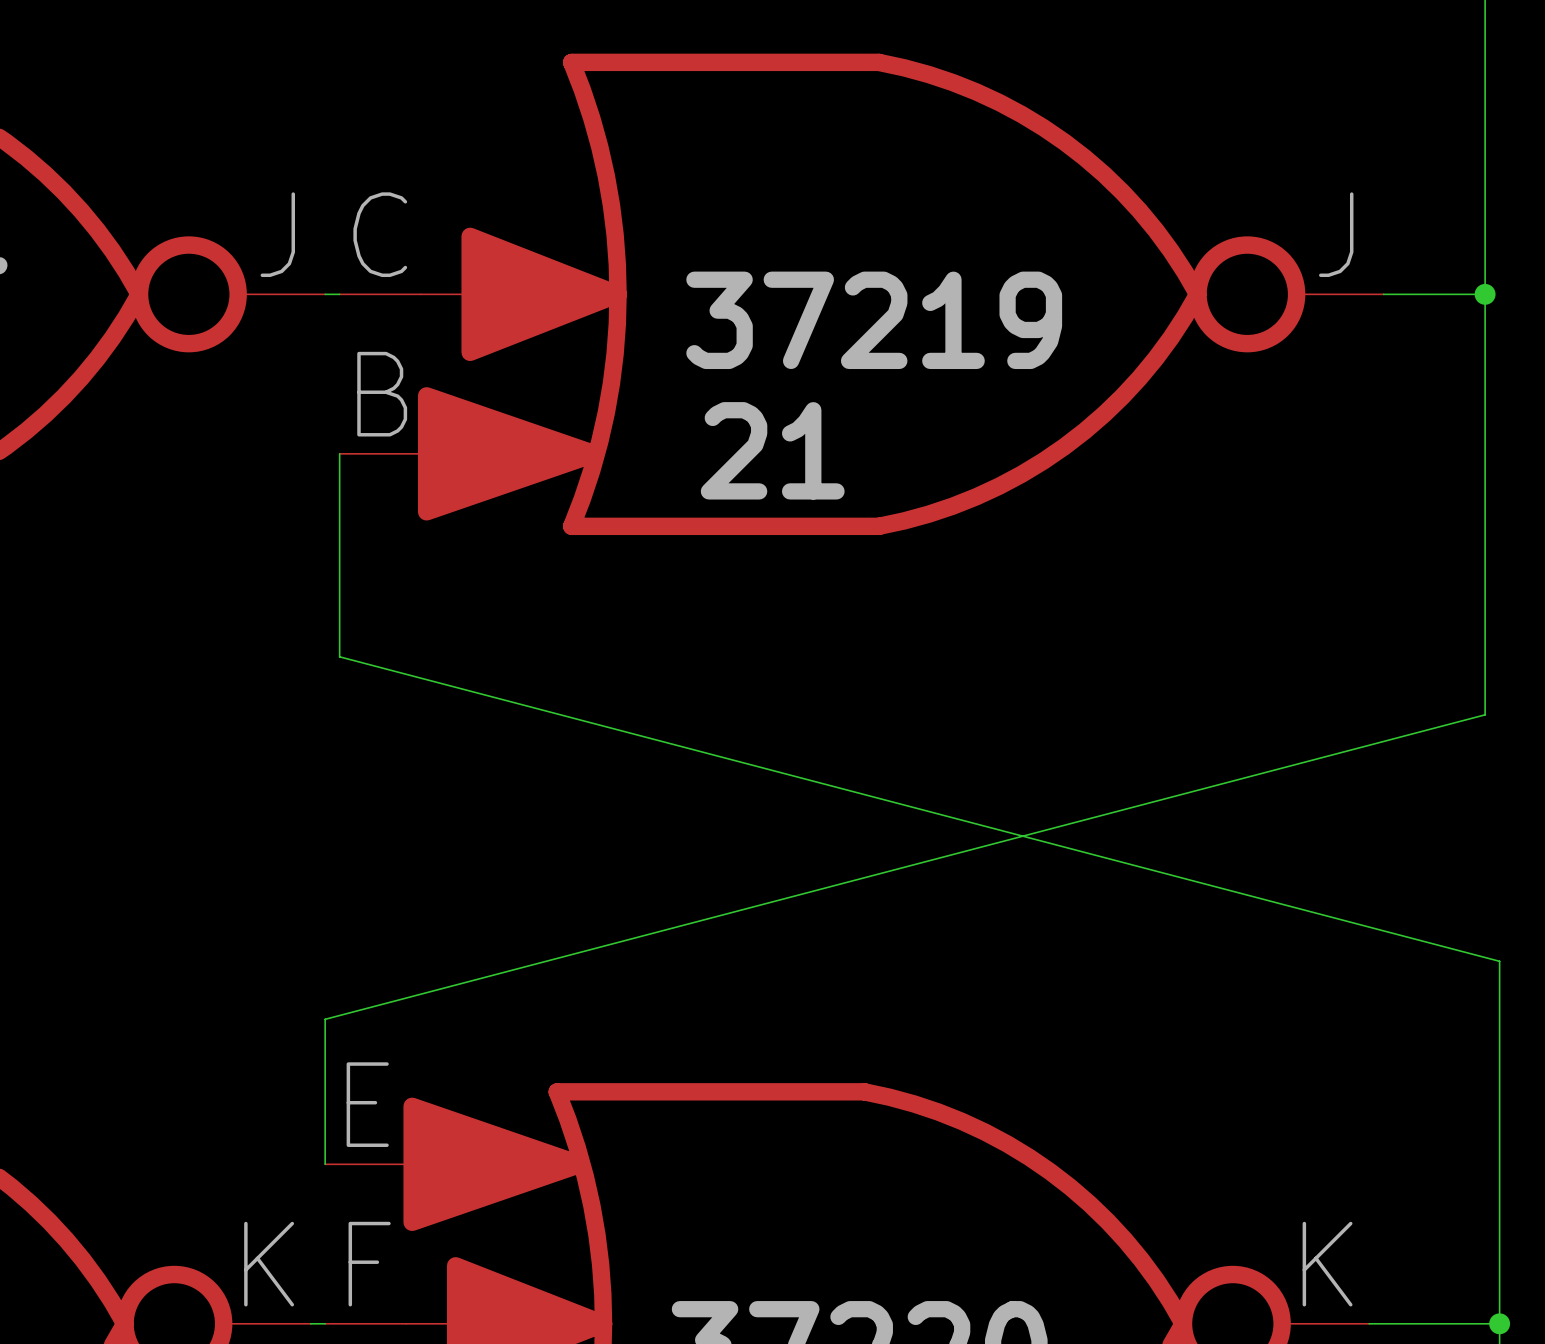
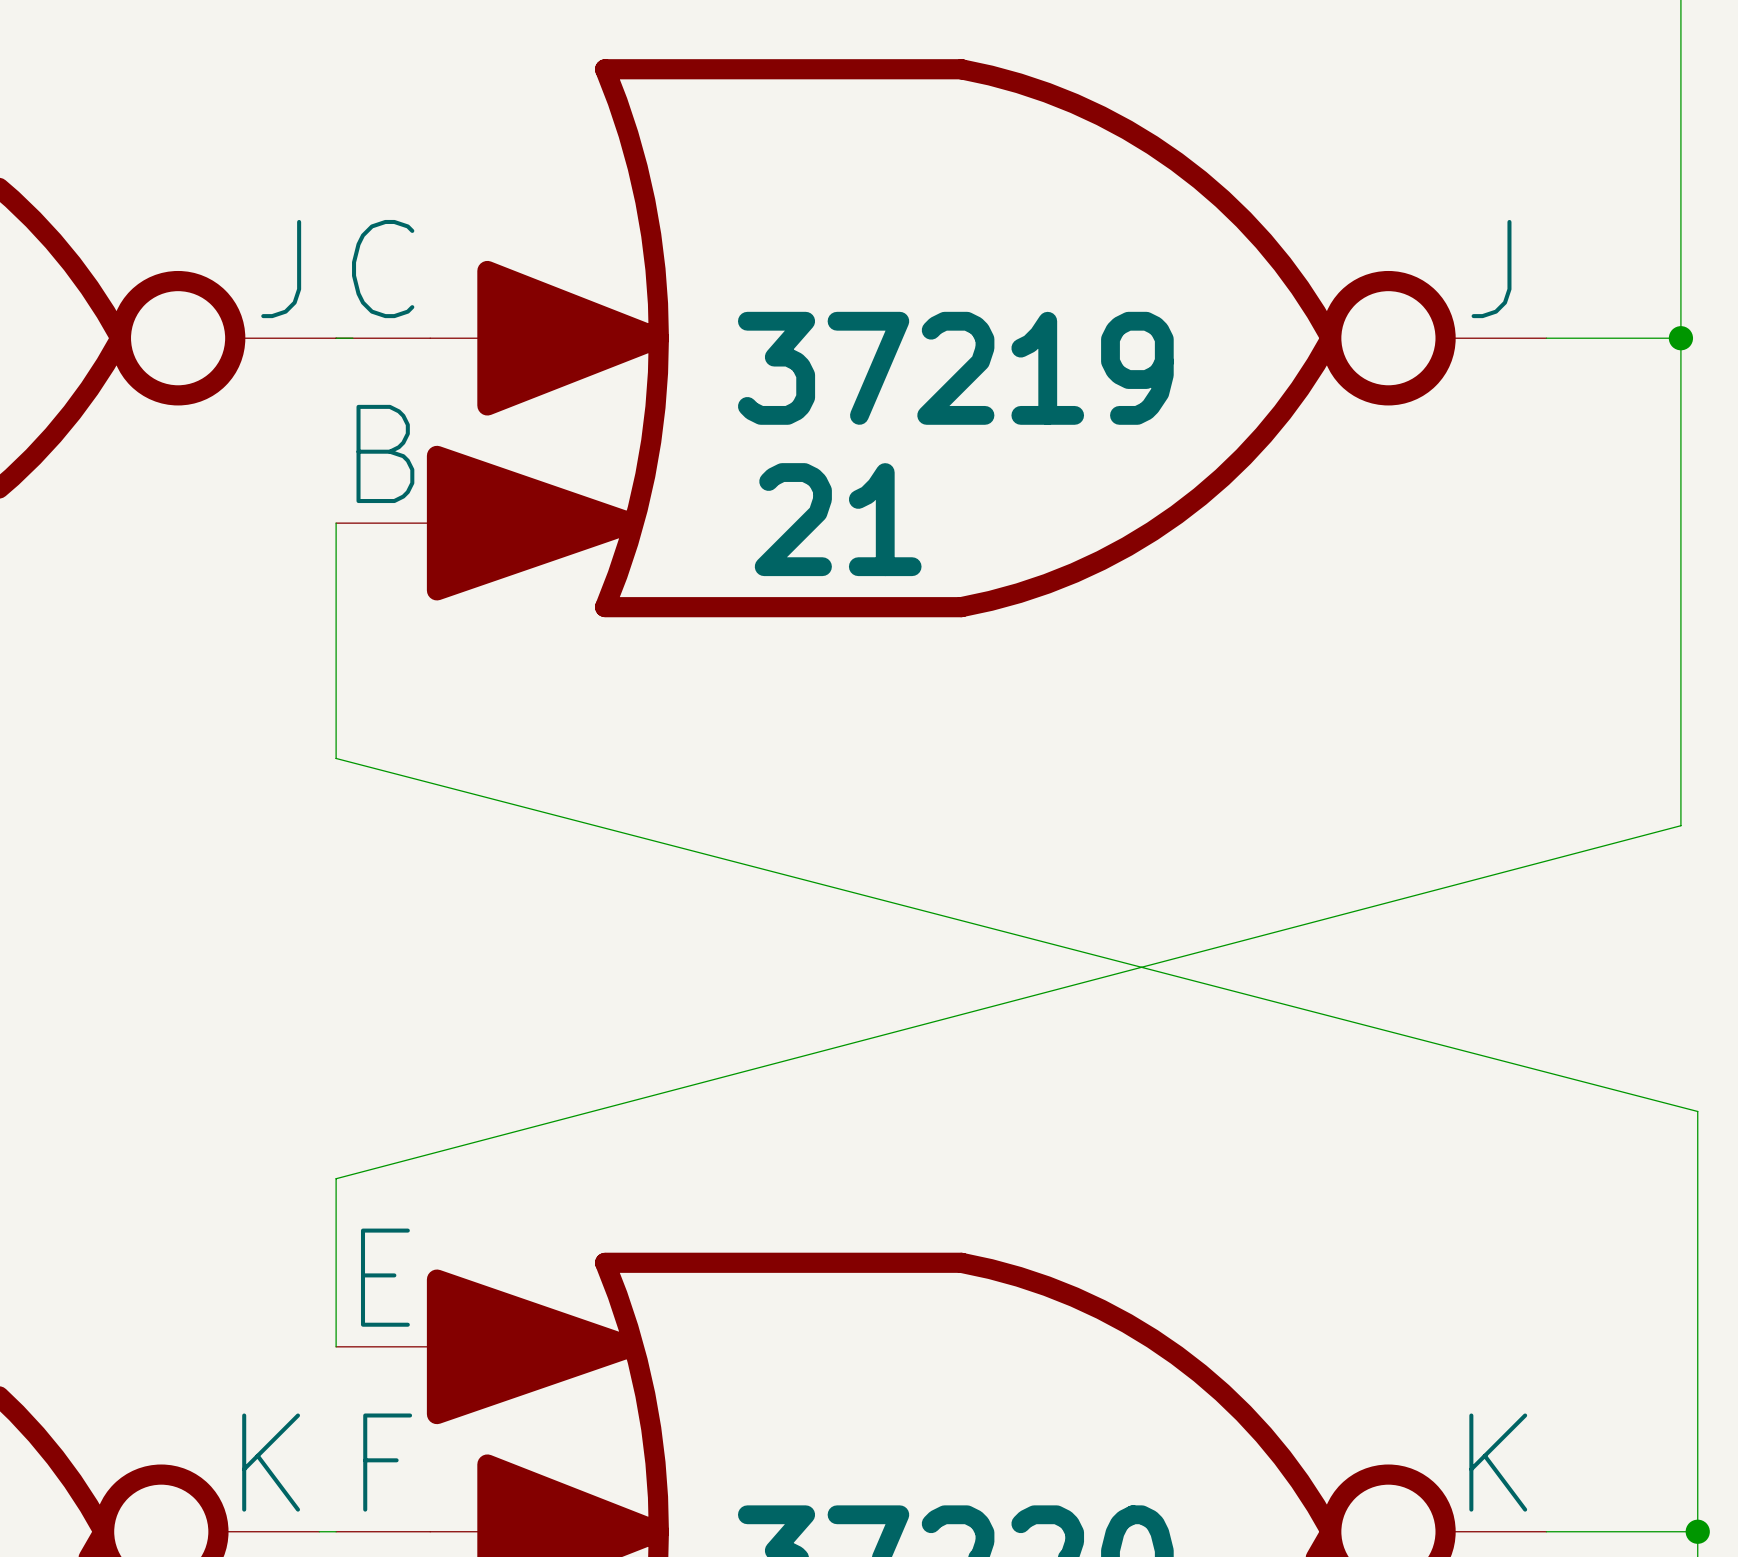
part position: (861, 294) -> (941, 338)
wire: (339, 453) (339, 656) (1499, 961) -> (336, 523) (336, 758) (1697, 1111)

